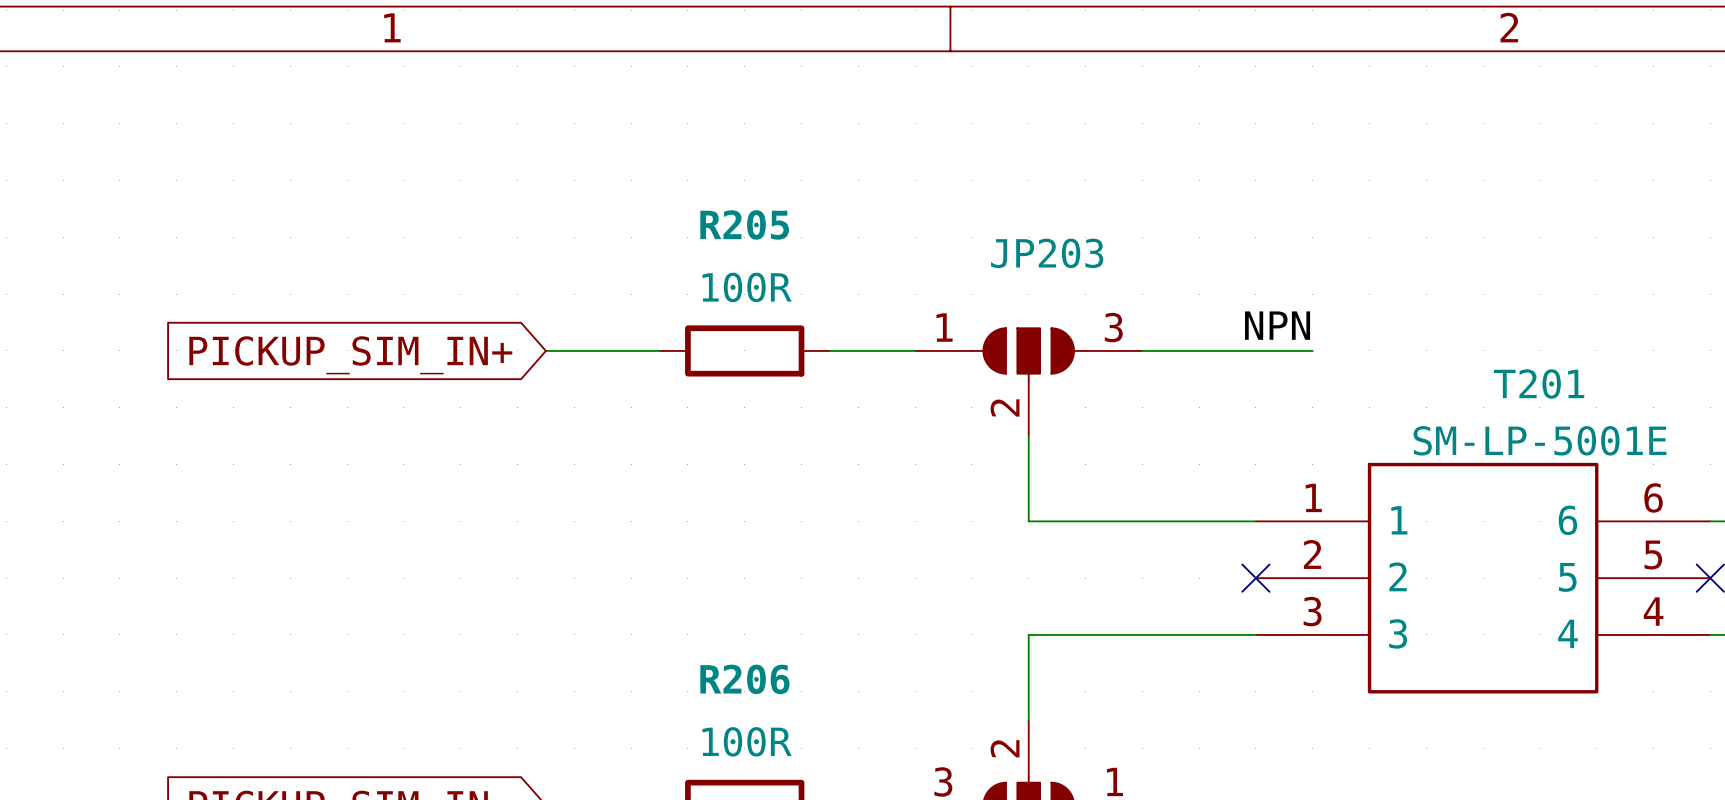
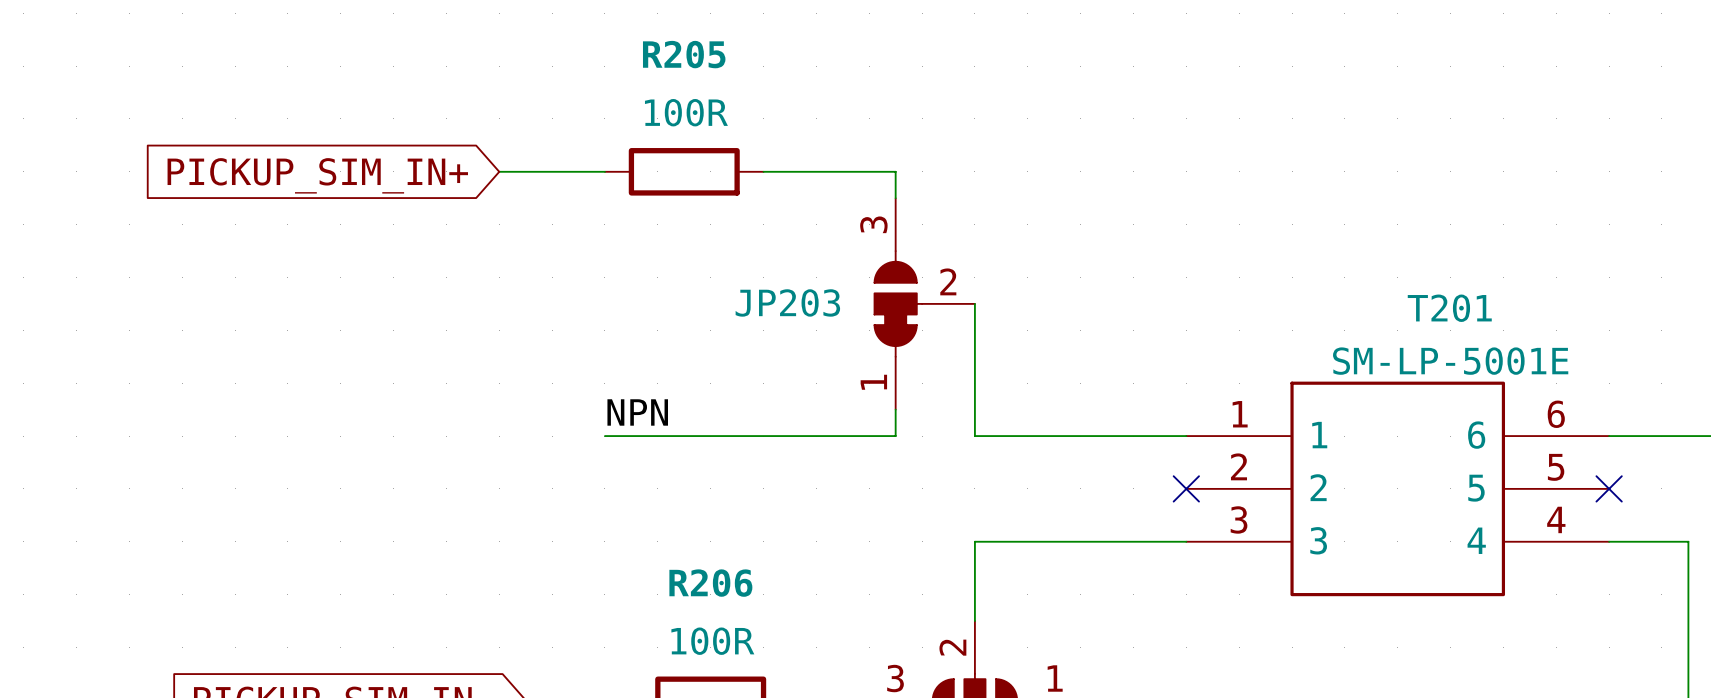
wire: none -> (763, 171) (895, 171) (895, 198)
JP203 name position: JP203 (1047, 253) -> JP203 (787, 302)
label: NPN (1277, 325) -> none
JP203 symbol: [915, 328, 1143, 437] -> [874, 198, 975, 410]
wire: (545, 350) (659, 350) -> (499, 171) (604, 171)
R205 position: (744, 350) -> (684, 171)
wire: (829, 350) (915, 350) -> none
wire: (1142, 350) (1312, 350) -> none
global label position: PICKUP_SIM_IN+ (350, 355) -> PICKUP_SIM_IN+ (317, 175)
wire: none -> (895, 409) (895, 436) (604, 436)
label: none -> NPN (637, 412)

